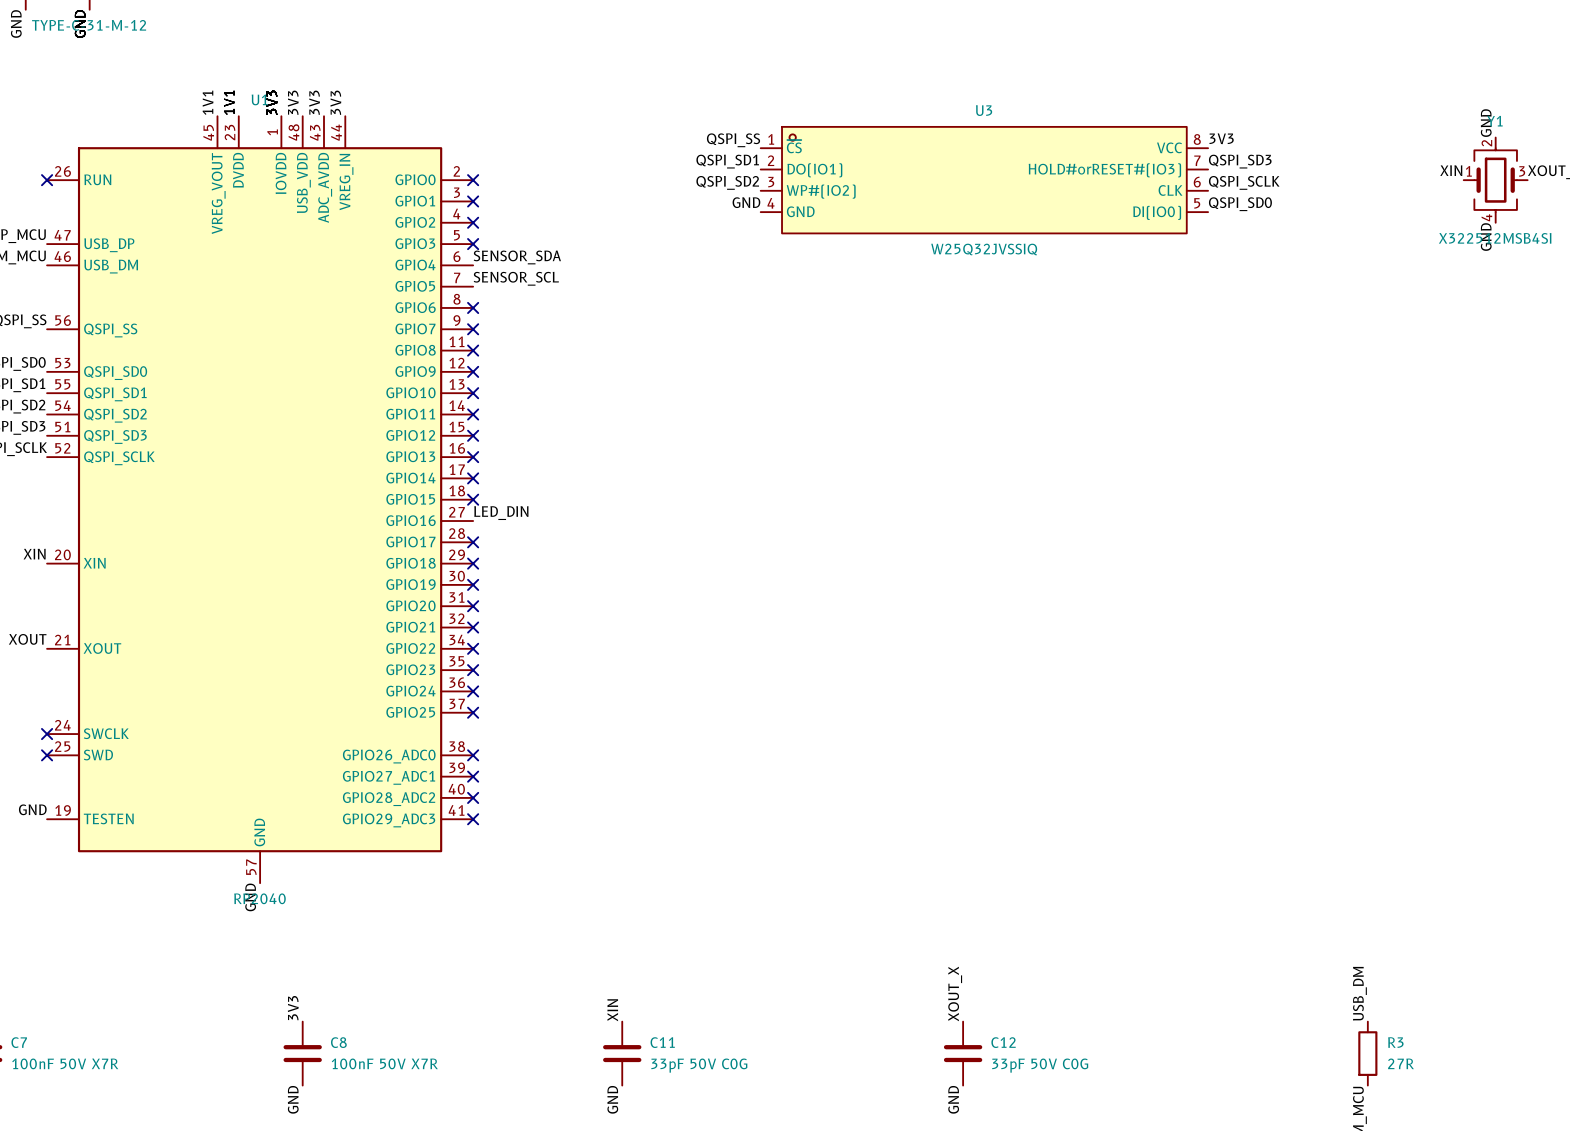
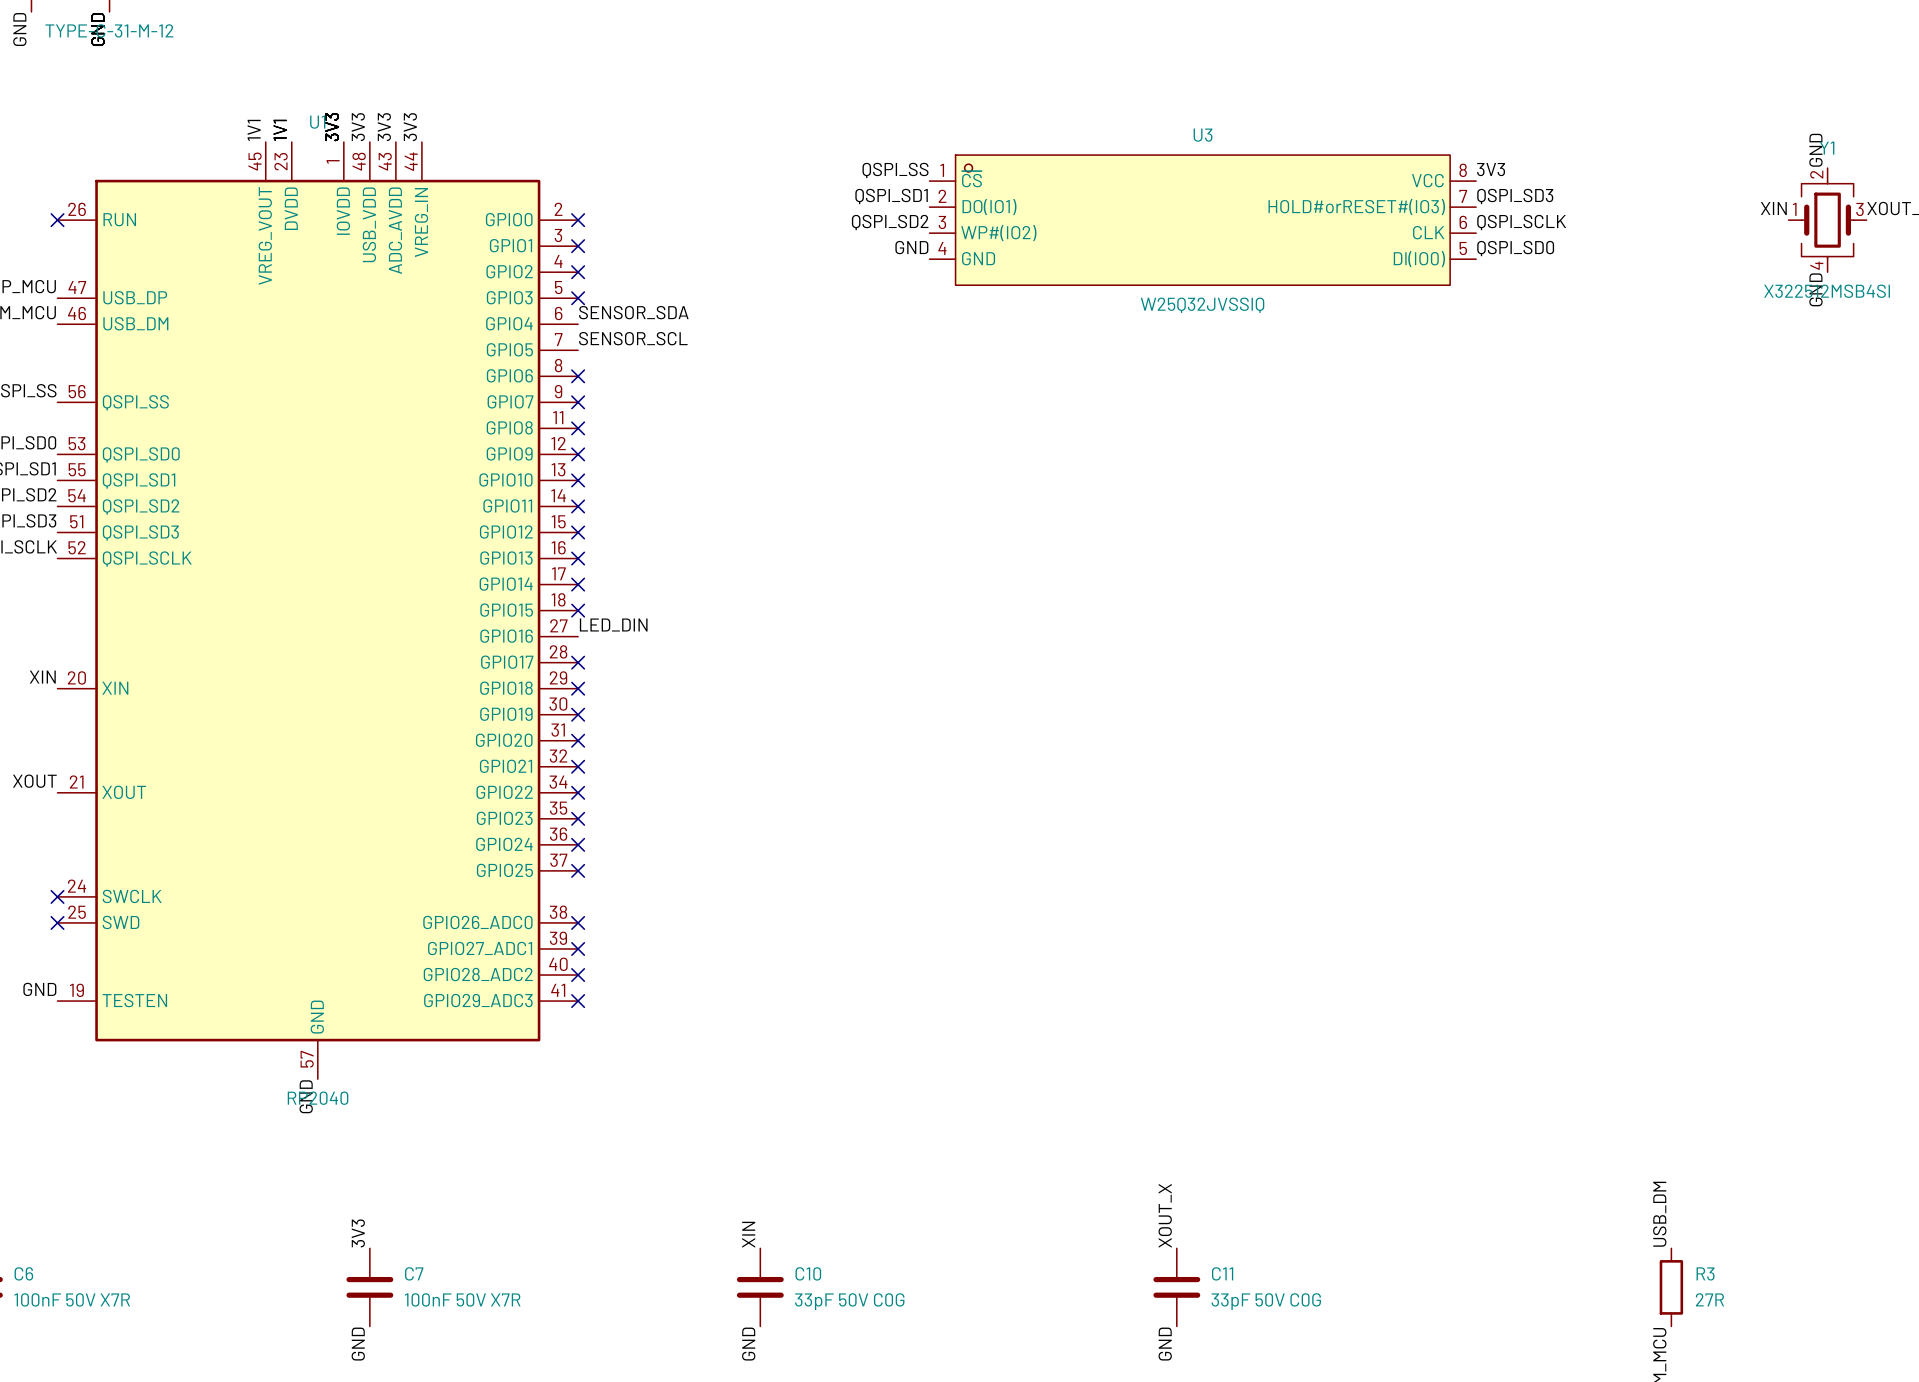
C7 name: C7 (19, 1042) -> C6 (23, 1273)
C8 name: C8 (338, 1042) -> C7 (414, 1273)
C11 name: C11 (662, 1042) -> C10 (808, 1273)
C12 name: C12 (1003, 1042) -> C11 (1222, 1273)

